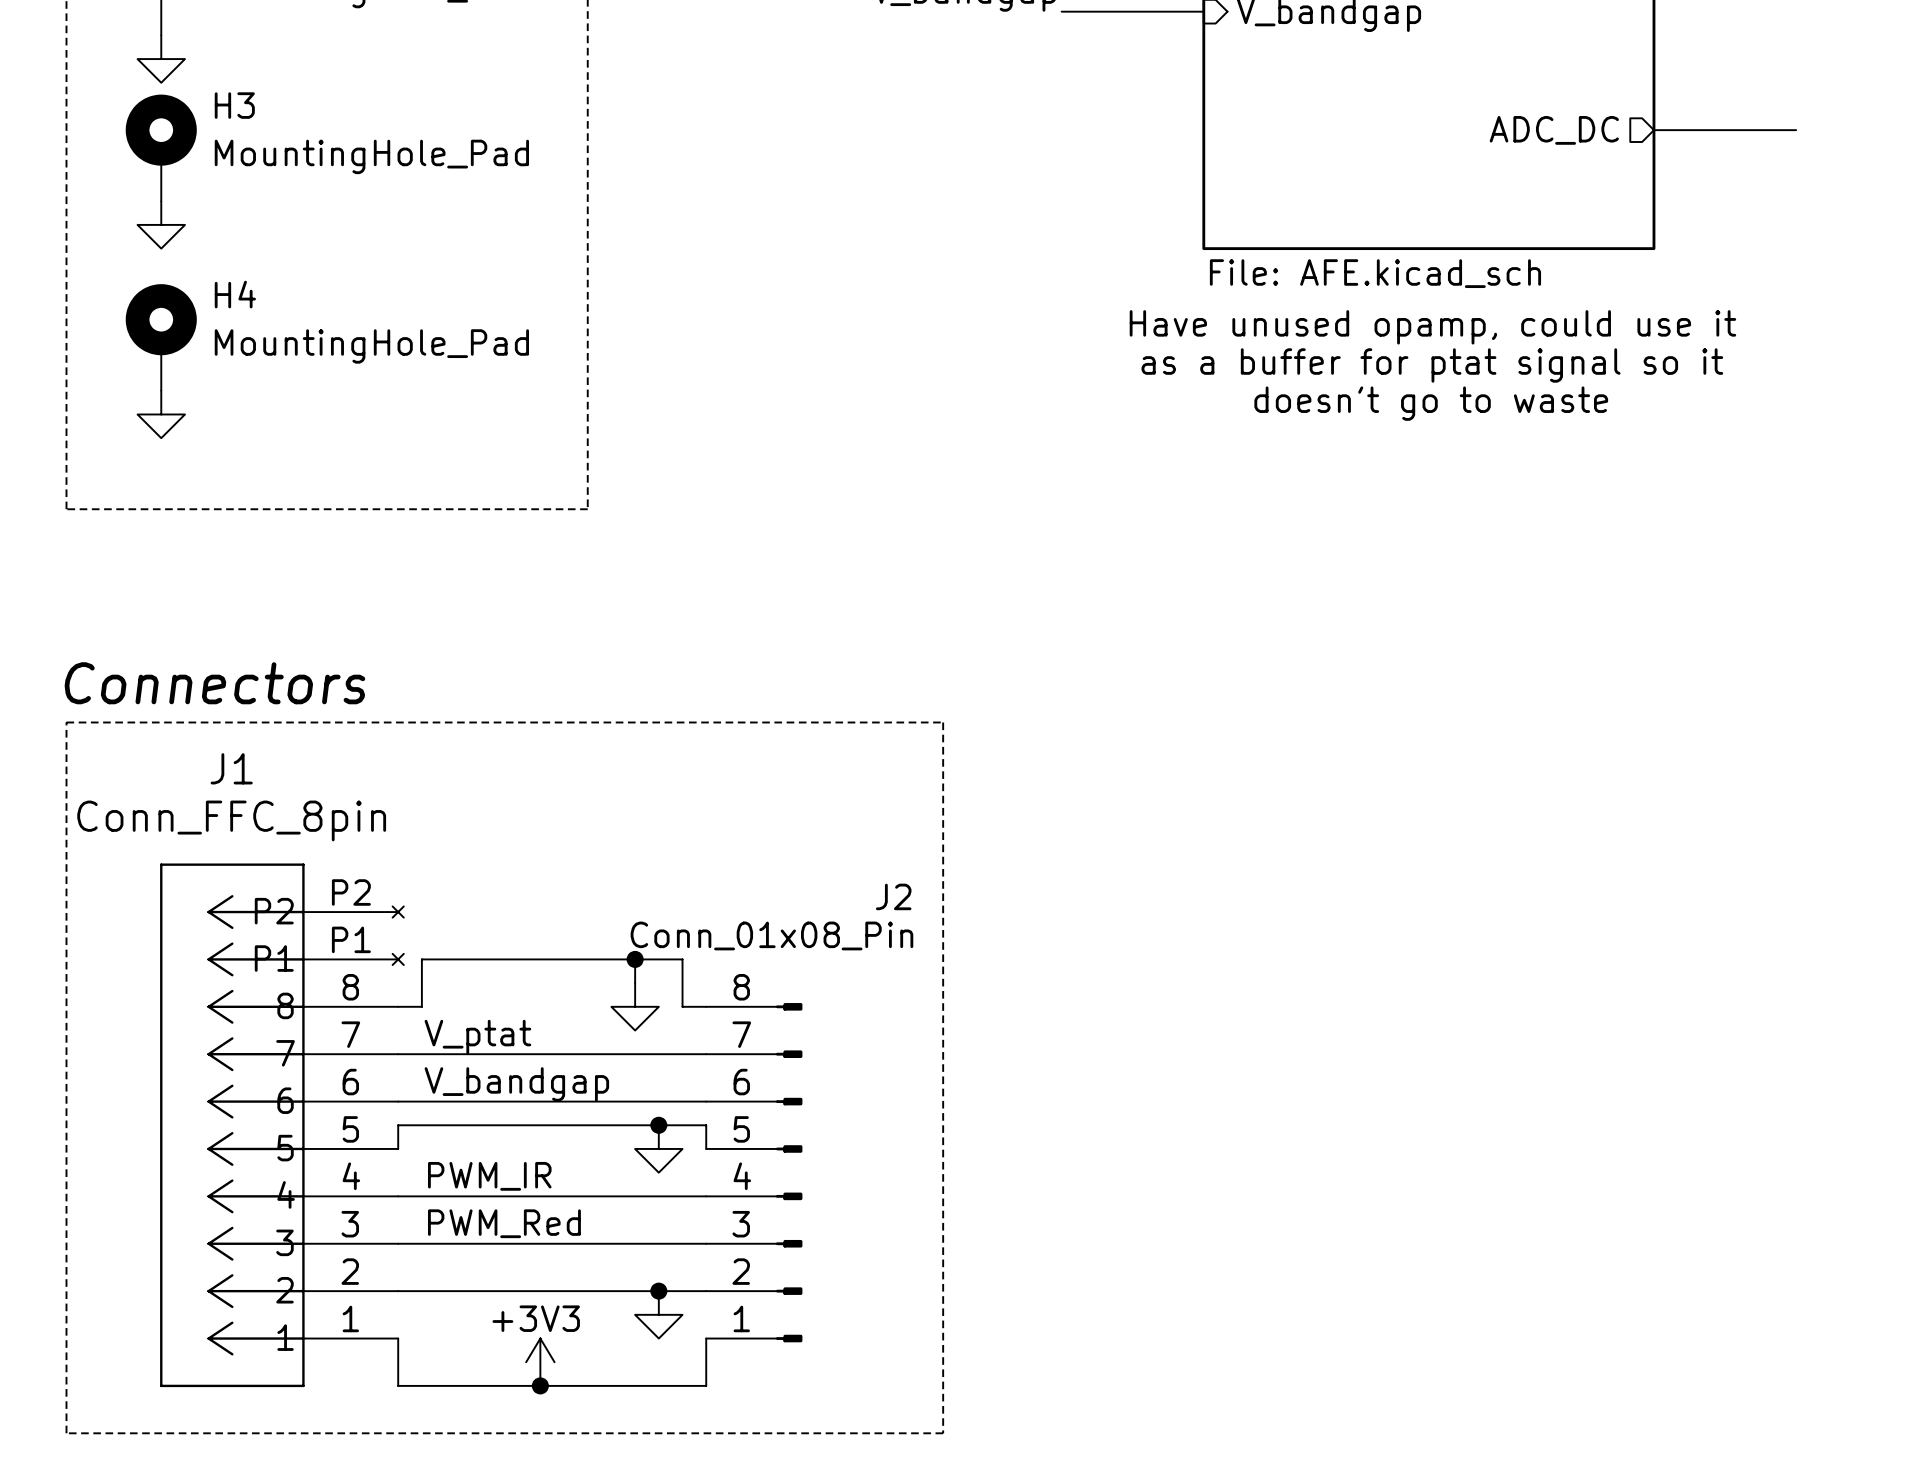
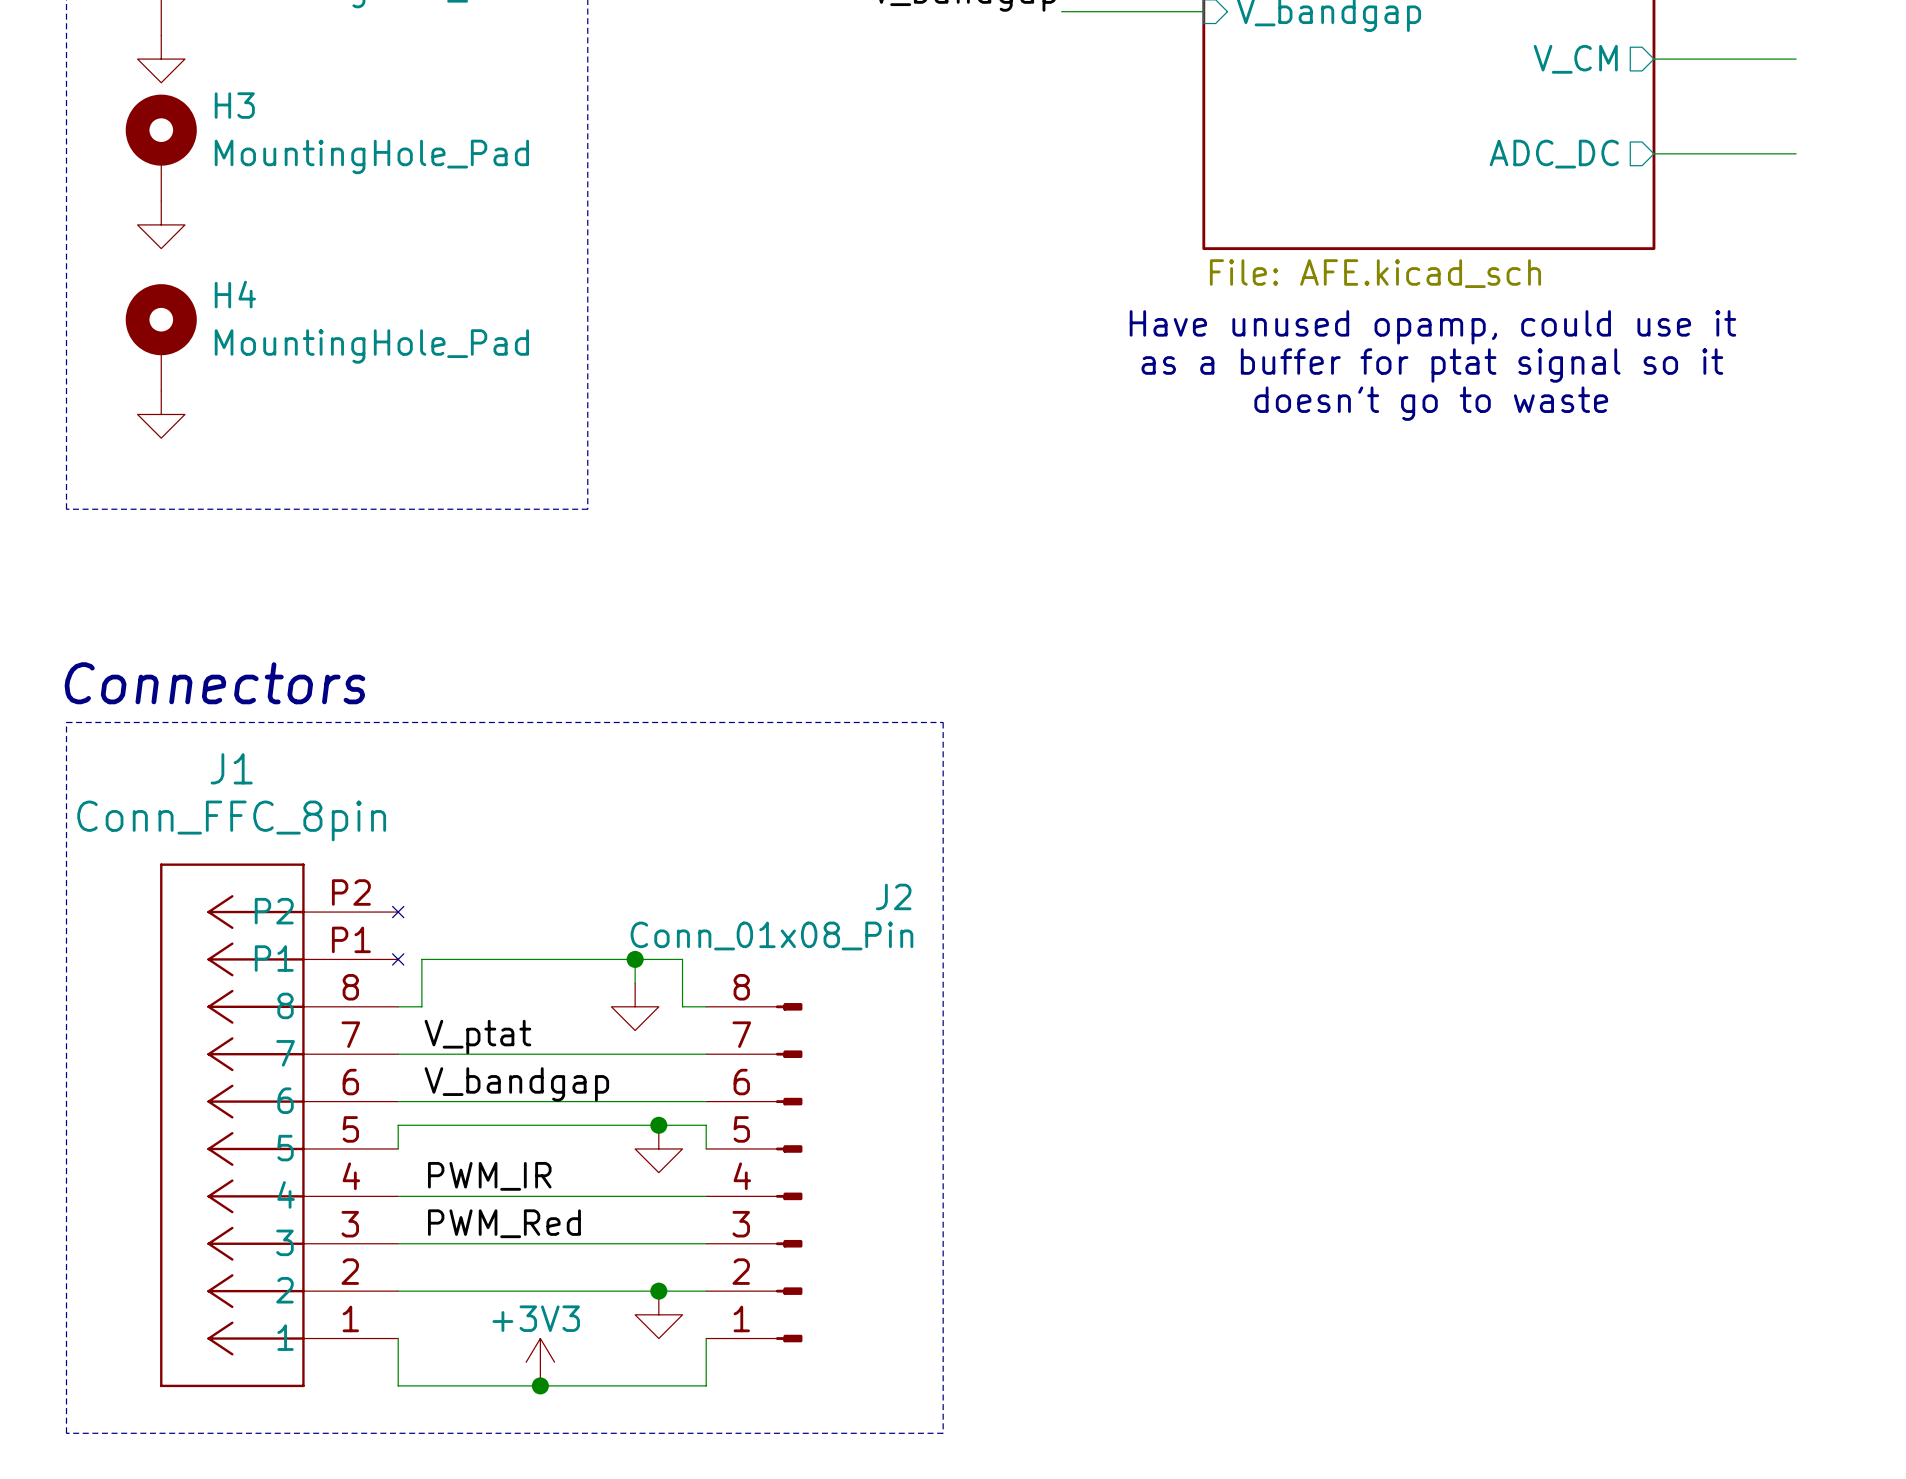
sheet pin: none -> V_CM (1575, 59)
wire: none -> (1653, 59) (1796, 59)
sheet pin position: ADC_DC (1554, 130) -> ADC_DC (1554, 154)
wire: (1653, 130) (1796, 130) -> (1653, 153) (1796, 153)

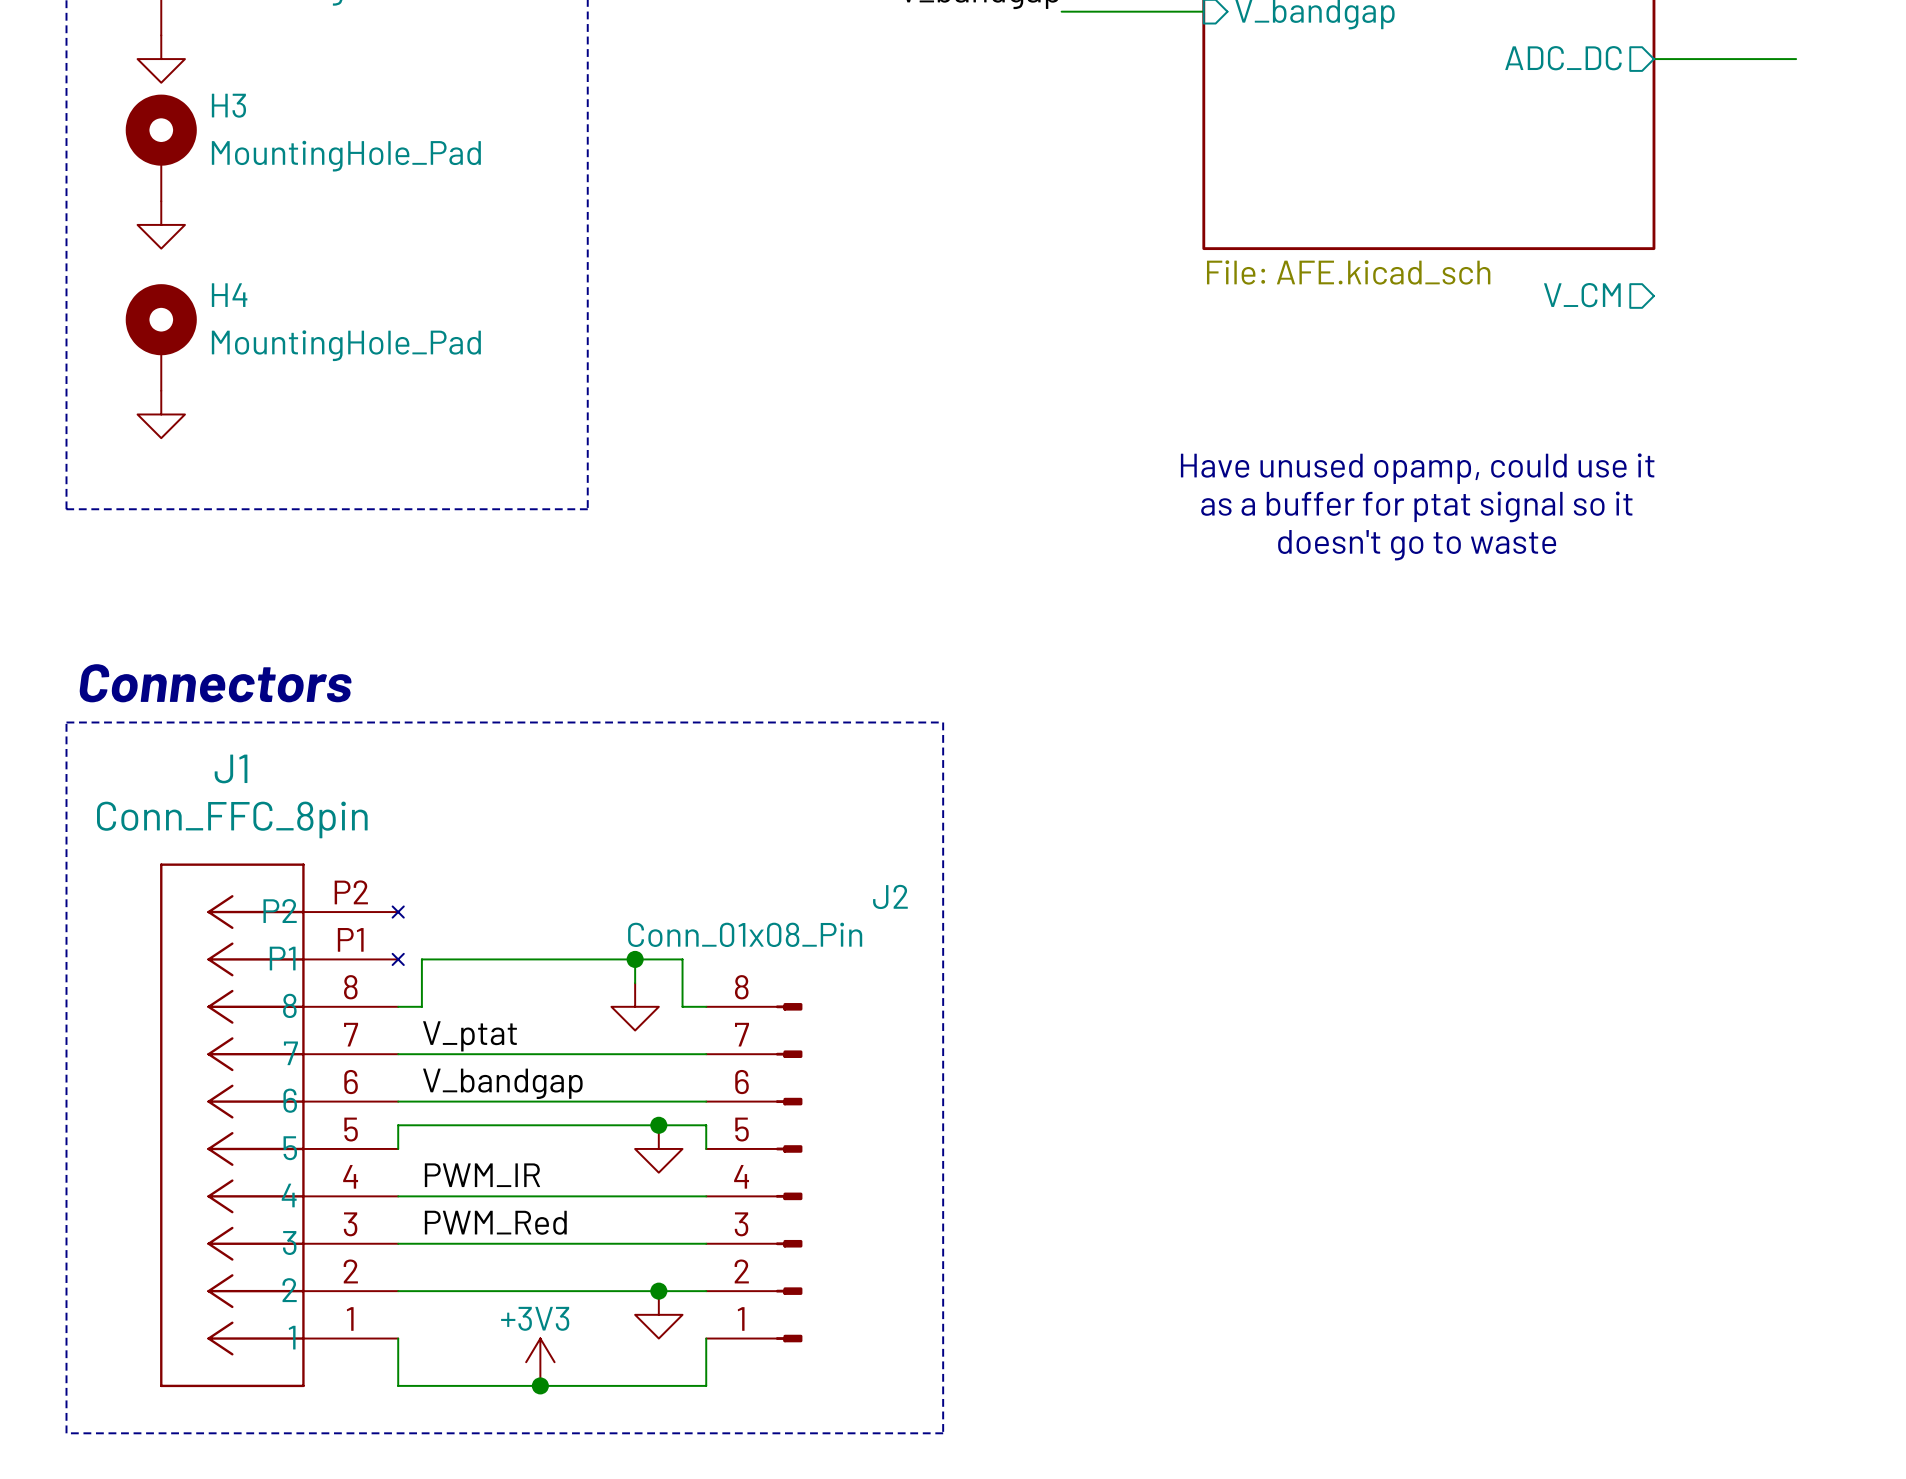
sheet pin: V_CM (1575, 59) -> ADC_DC (1563, 58)
wire: (1653, 153) (1796, 153) -> none
sheet pin: ADC_DC (1554, 154) -> none
sheet pin: none -> V_CM (1582, 295)
text position: Have unused opamp, could use it (1432, 327) -> Have unused opamp, could use it (1417, 468)
text position: as a buffer for ptat signal so it (1432, 365) -> as a buffer for ptat signal so it (1416, 506)
text position: doesn't go to waste (1431, 403) -> doesn't go to waste (1417, 545)

